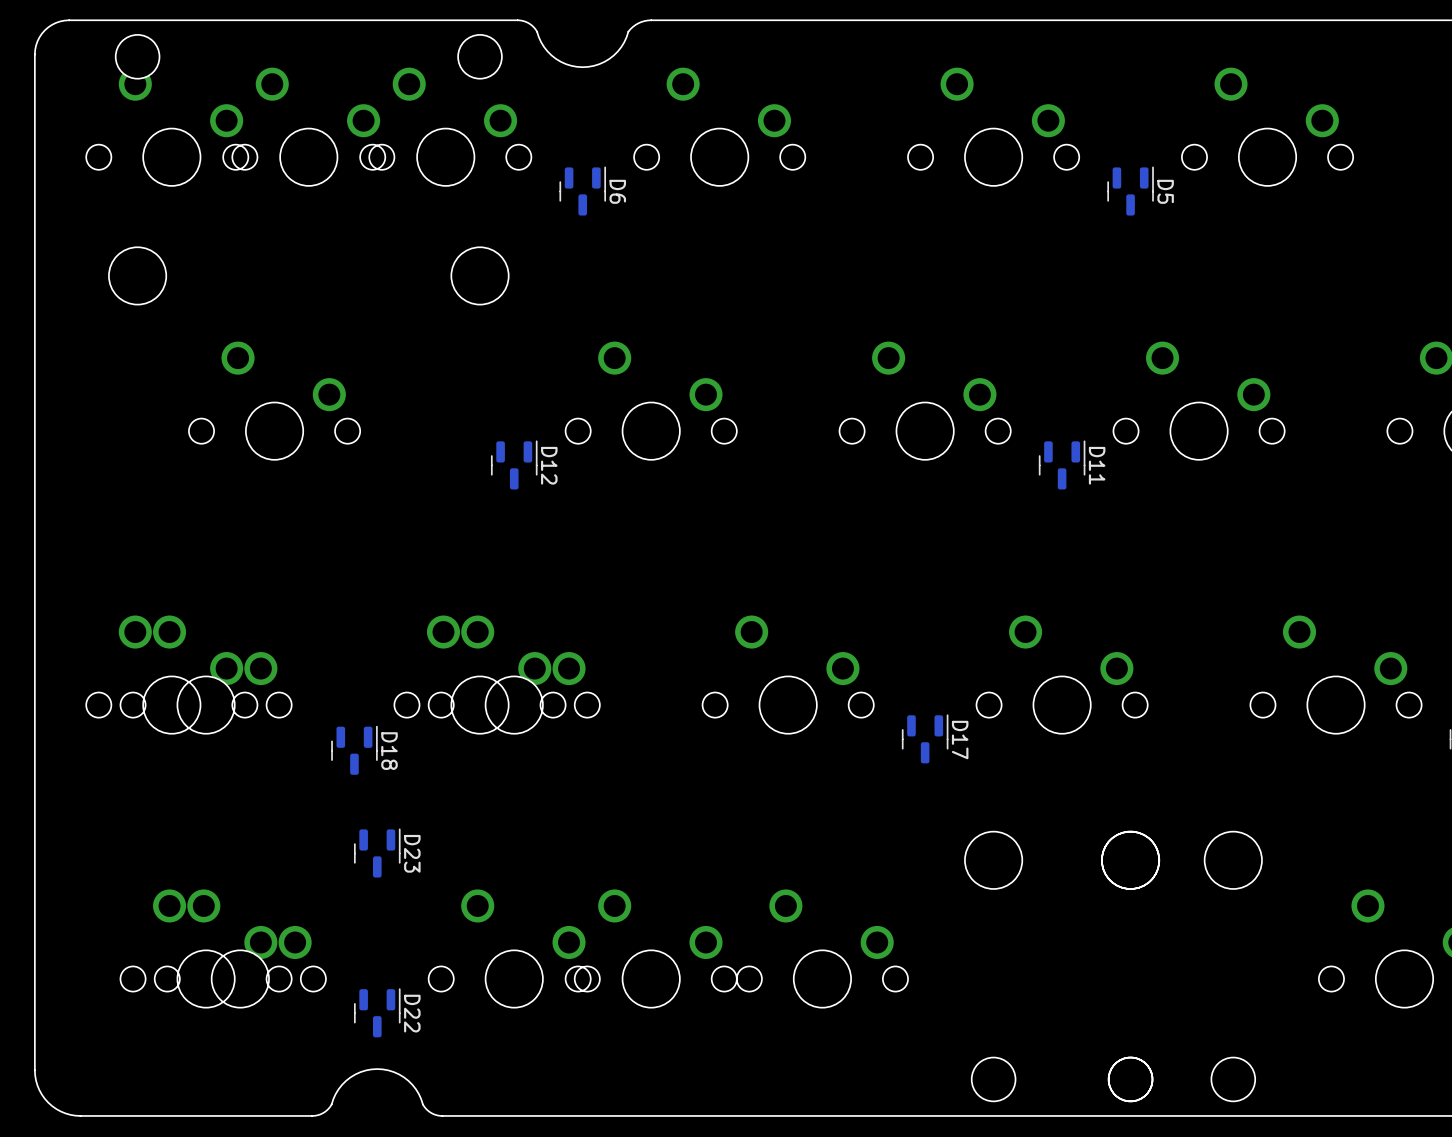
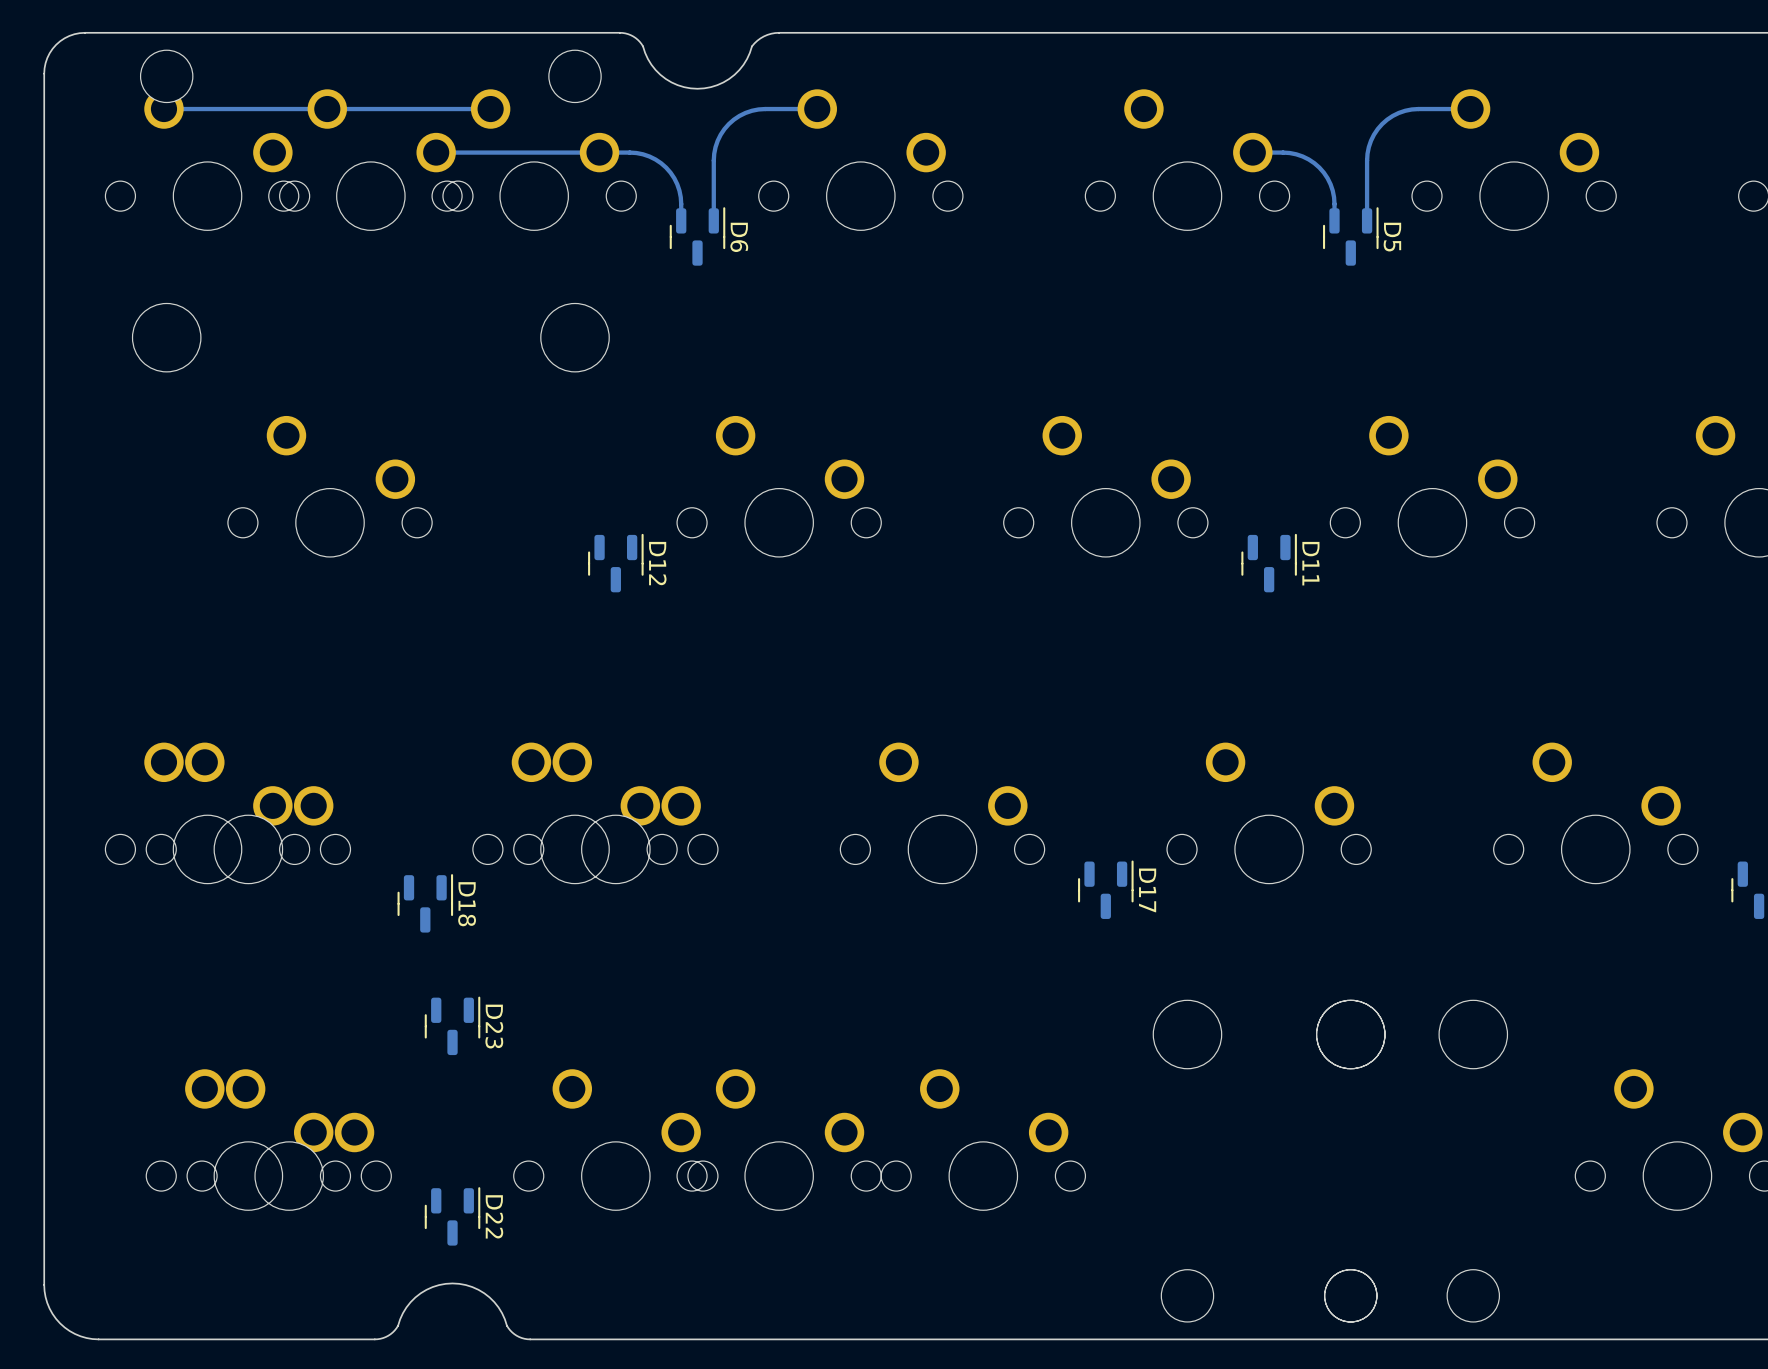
track: none -> (490, 109) (163, 109)
track: none -> (817, 109) (758, 109) (739, 115) (728, 124) (720, 134) (714, 153) (713, 220)
track: none -> (1470, 109) (1411, 109) (1392, 115) (1382, 124) (1373, 134) (1367, 153) (1367, 220)
track: none -> (436, 152) (629, 152) (643, 154) (661, 163) (674, 178) (680, 197) (681, 220)
track: none -> (1252, 152) (1289, 153) (1302, 156) (1314, 163) (1323, 172) (1330, 184) (1334, 197) (1334, 220)

